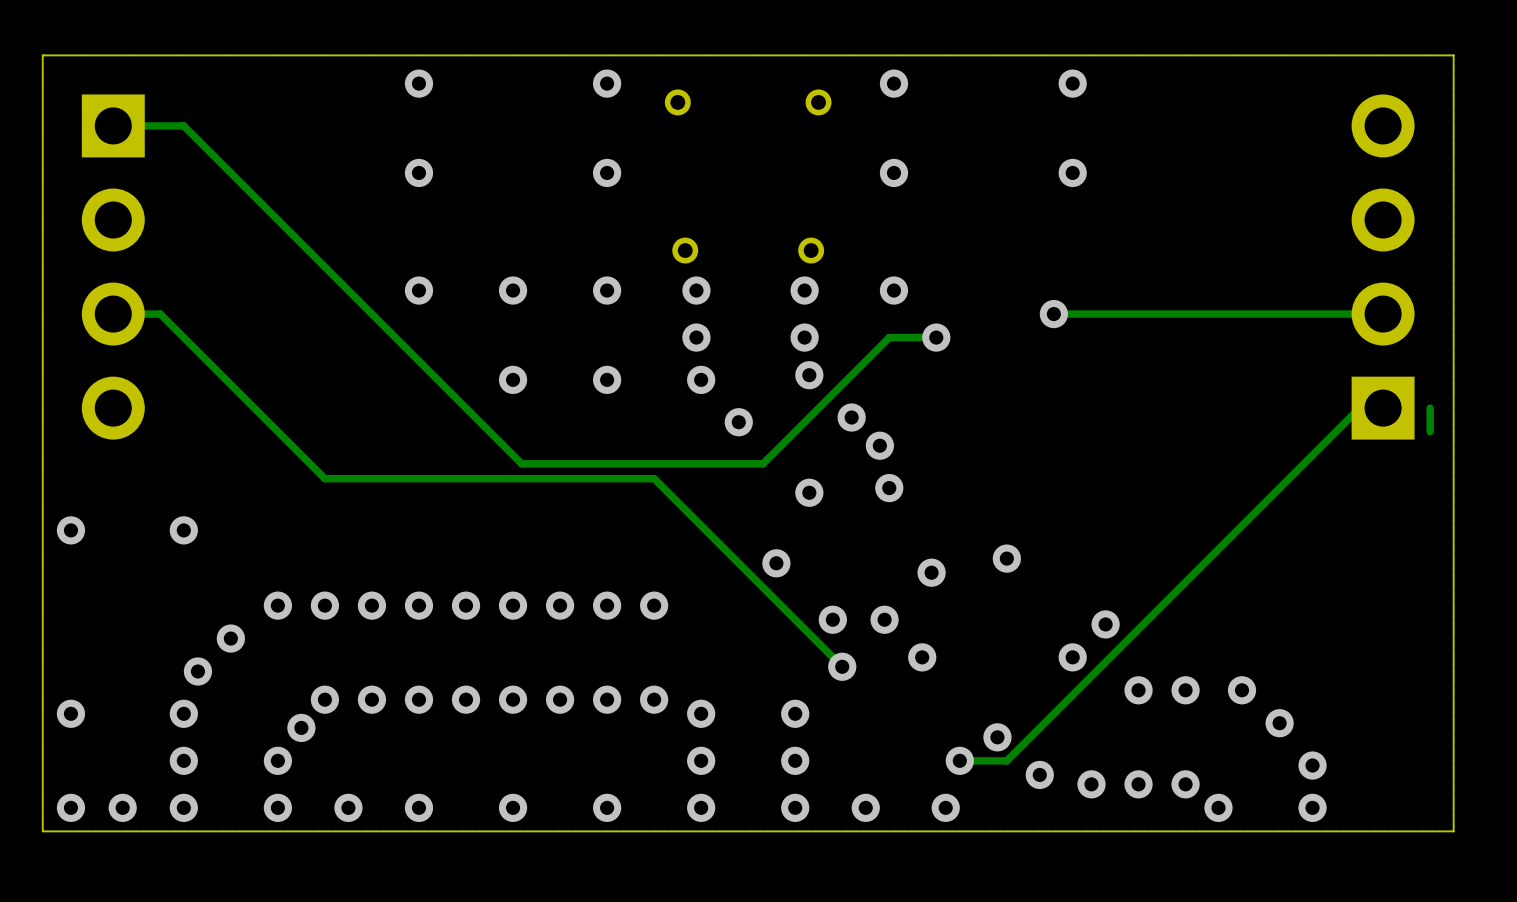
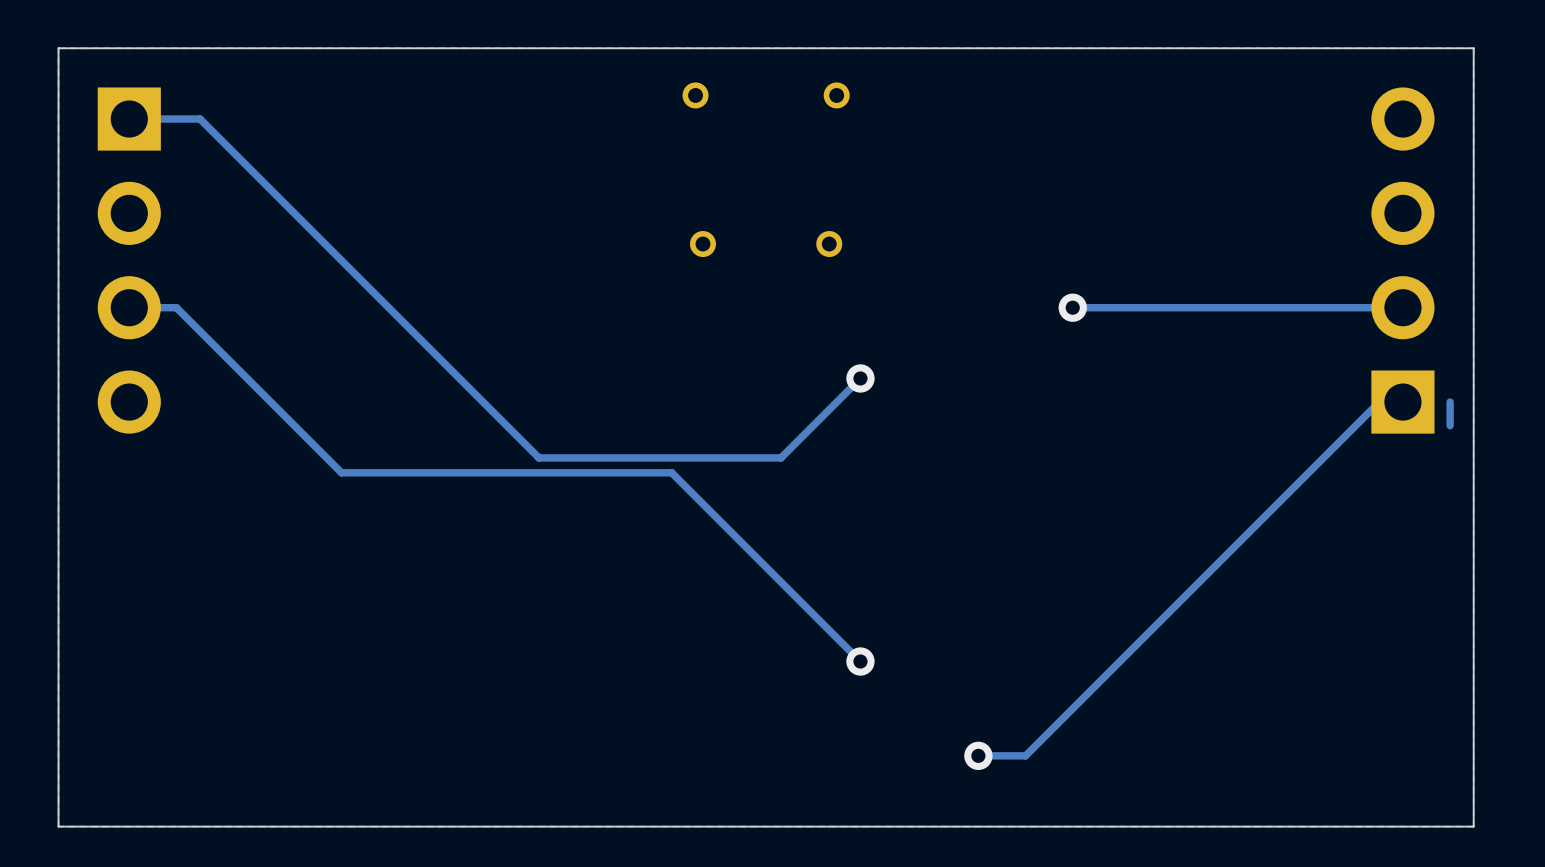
via: (418, 83) -> none
via: (607, 83) -> none
via: (893, 83) -> none
via: (1072, 83) -> none
via: (418, 172) -> none
via: (607, 172) -> none
via: (893, 172) -> none
via: (1072, 172) -> none
via: (418, 290) -> none
via: (513, 290) -> none
via: (607, 290) -> none
via: (696, 290) -> none
via: (804, 290) -> none
via: (893, 290) -> none
via: (696, 337) -> none
via: (804, 337) -> none
track: (936, 337) (889, 337) (842, 384) -> none
via: (936, 337) -> none
via: (809, 375) -> none
via: (513, 379) -> none
via: (607, 379) -> none
via: (701, 379) -> none
via: none -> (860, 378)
via: (851, 417) -> none
via: (738, 422) -> none
via: (879, 445) -> none
via: (889, 488) -> none
via: (809, 492) -> none
via: (70, 530) -> none
via: (183, 530) -> none
via: (1006, 558) -> none
via: (776, 563) -> none
via: (931, 572) -> none
via: (277, 605) -> none
via: (324, 605) -> none
via: (371, 605) -> none
via: (418, 605) -> none
via: (466, 605) -> none
via: (513, 605) -> none
via: (560, 605) -> none
via: (607, 605) -> none
via: (654, 605) -> none
via: (832, 619) -> none
via: (884, 619) -> none
via: (1105, 624) -> none
via: (230, 638) -> none
via: (922, 657) -> none
via: (1072, 657) -> none
via: (197, 671) -> none
via: (1138, 690) -> none
via: (1185, 690) -> none
via: (1242, 690) -> none
via: (324, 699) -> none
via: (371, 699) -> none
via: (418, 699) -> none
via: (466, 699) -> none
via: (513, 699) -> none
via: (560, 699) -> none
via: (607, 699) -> none
via: (654, 699) -> none
via: (70, 713) -> none
via: (183, 713) -> none
via: (701, 713) -> none
via: (795, 713) -> none
via: (1279, 723) -> none
via: (301, 727) -> none
via: (997, 737) -> none
via: (183, 760) -> none
via: (277, 760) -> none
via: (701, 760) -> none
via: (795, 760) -> none
via: (1312, 765) -> none
via: (1039, 774) -> none
via: (1091, 784) -> none
via: (1138, 784) -> none
via: (1185, 784) -> none
via: (70, 807) -> none
via: (122, 807) -> none
via: (183, 807) -> none
via: (277, 807) -> none
via: (348, 807) -> none
via: (418, 807) -> none
via: (513, 807) -> none
via: (607, 807) -> none
via: (701, 807) -> none
via: (795, 807) -> none
via: (865, 807) -> none
via: (945, 807) -> none
via: (1218, 807) -> none
via: (1312, 807) -> none

